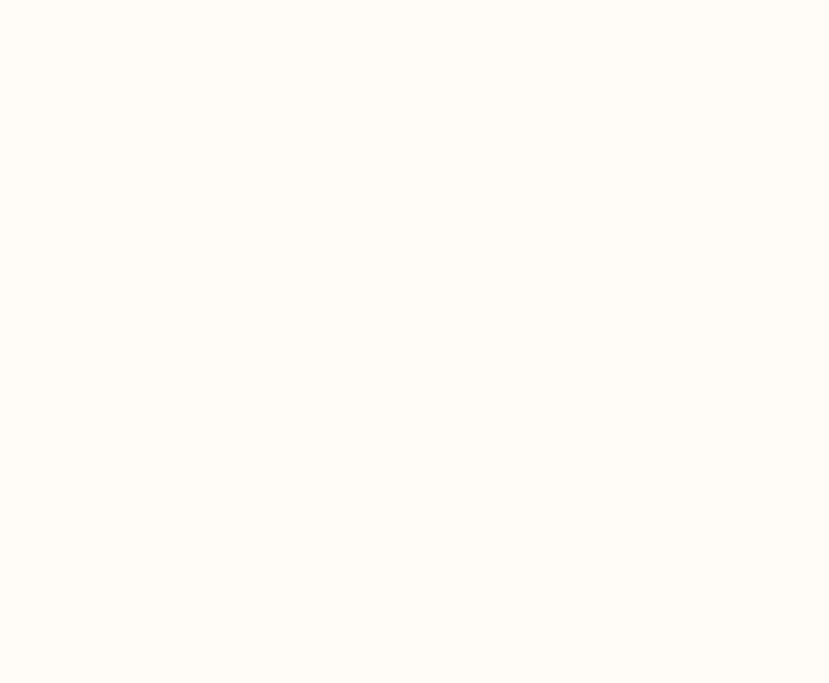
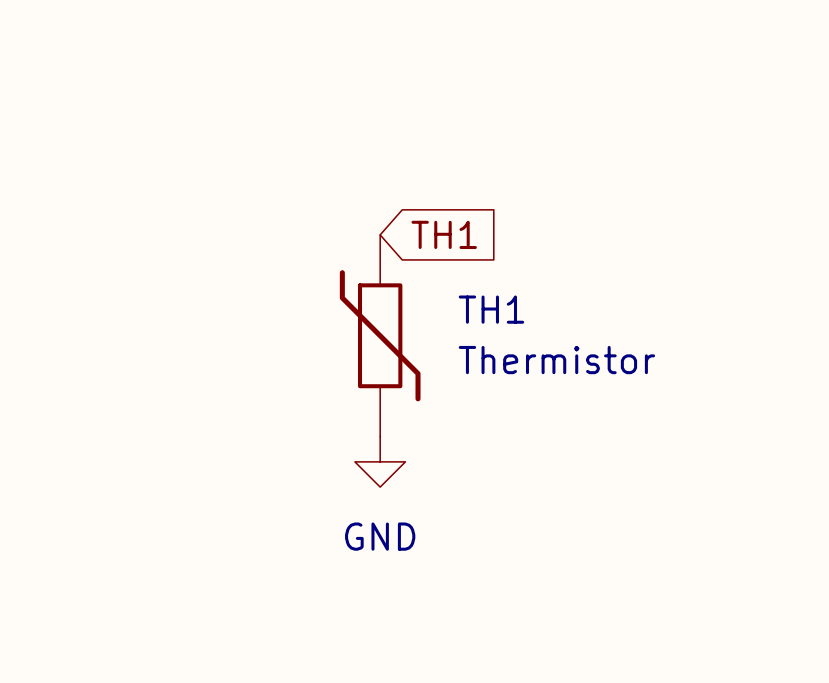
global label: none -> TH1 (444, 234)
TH1: none -> Thermistor (380, 335)
power symbol: none -> GND (380, 461)

